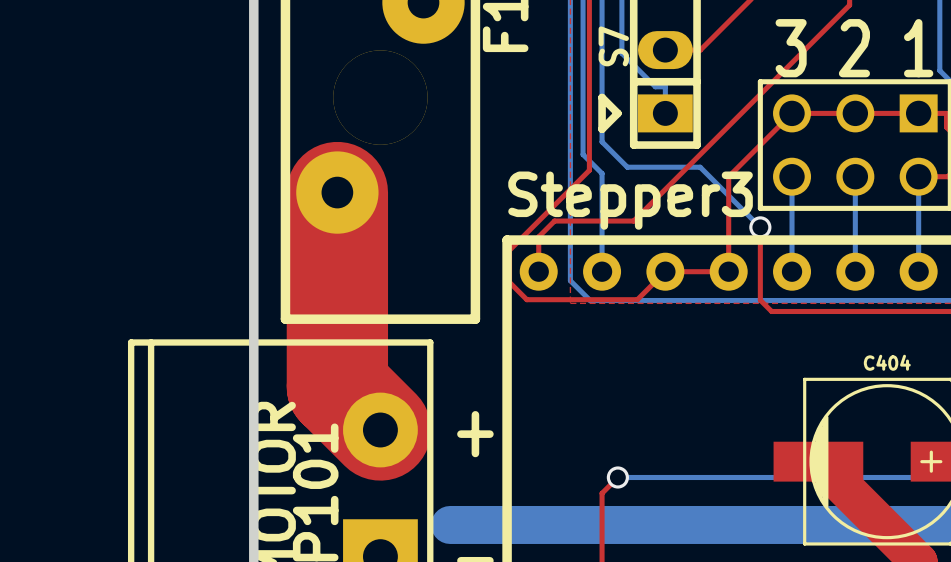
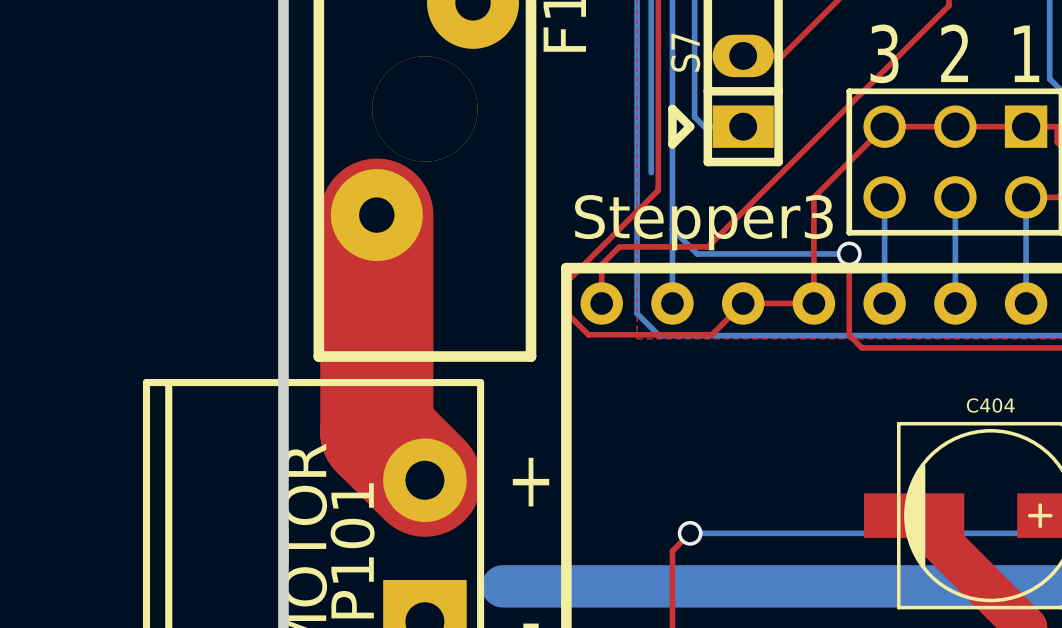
bottom track: (621, 53) (655, 86) (665, 86) (665, 113) -> (694, 59) (694, 117) (704, 126) (743, 126)
bottom track: (602, 141) (627, 167) (700, 167) (760, 227) -> (672, 229) (697, 253) (849, 253)
bottom track: (583, 154) (602, 173) -> (672, 158) (672, 193)

